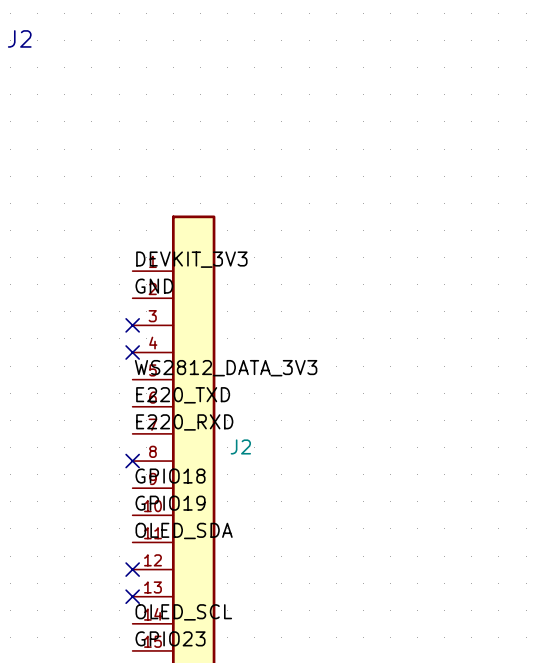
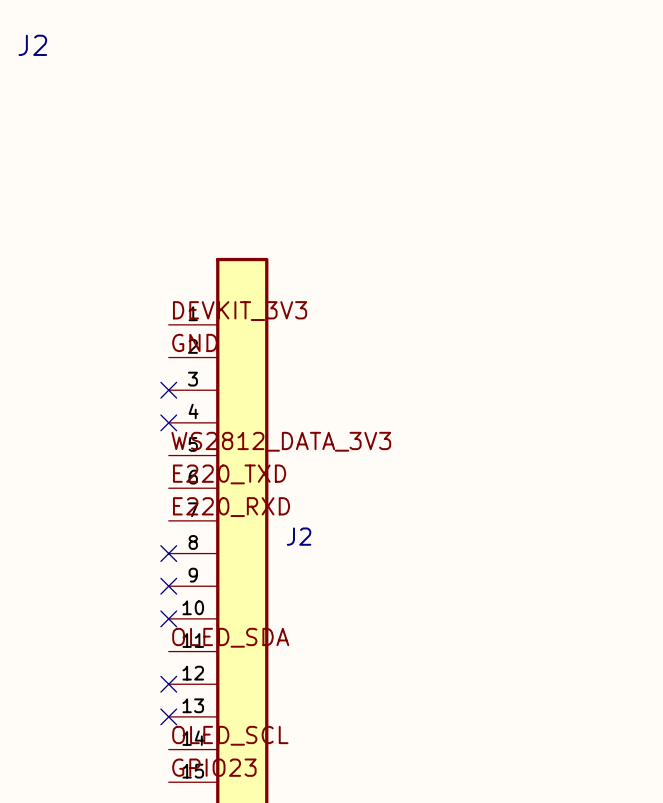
label: GPIO18 (170, 476) -> none
no-connect mark: none -> (168, 586)
label: GPIO19 (170, 503) -> none
no-connect mark: none -> (168, 618)

